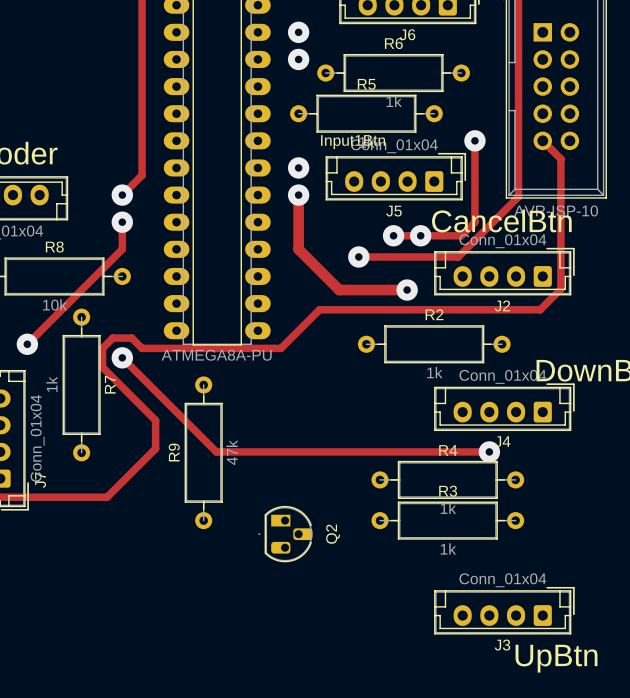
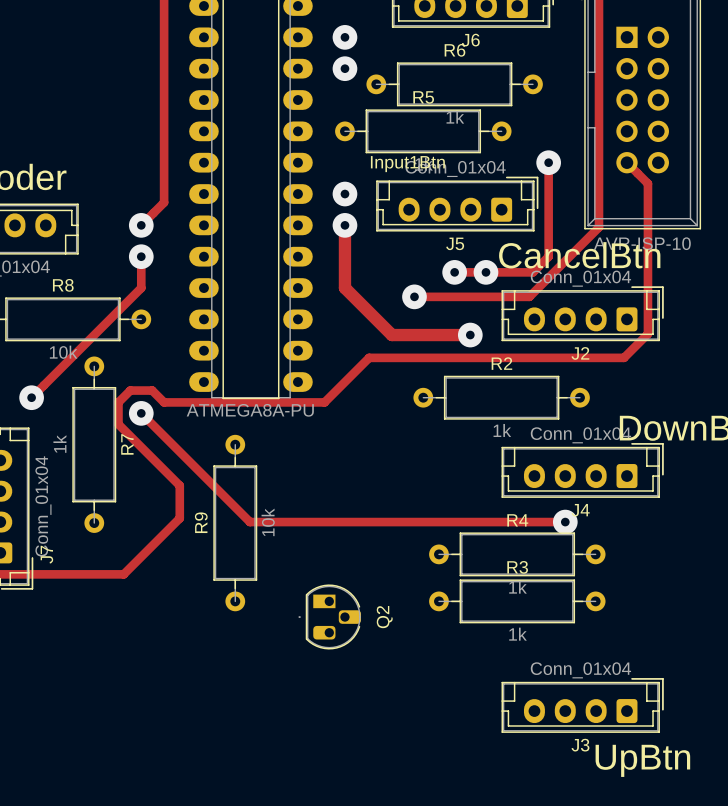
R9 value: 47k (232, 452) -> 10k (268, 522)

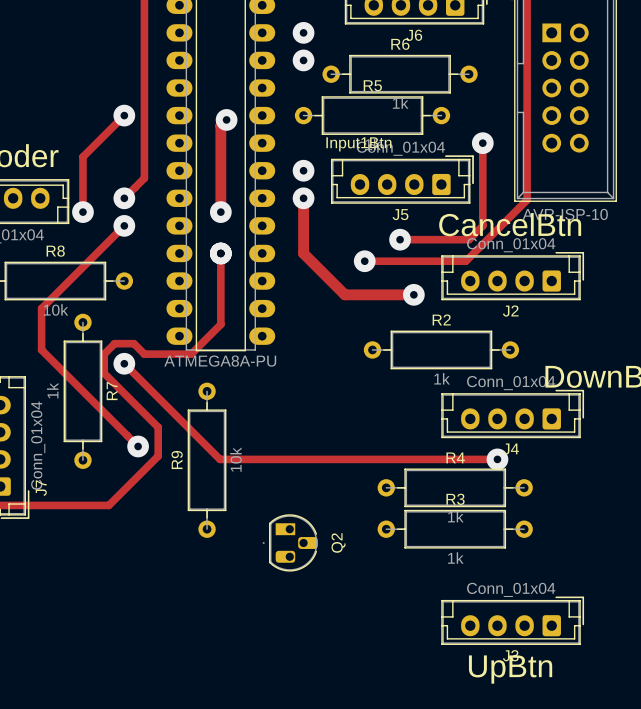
track: none -> (124, 115) (82, 156) (82, 212)
via: none -> (124, 115)
track: none -> (226, 119) (220, 125) (220, 212)
via: none -> (226, 119)
track: (626, 162) (647, 183) (647, 333) (624, 357) (369, 357) (324, 402) (217, 402) -> (220, 253) (220, 324) (191, 354)
via: none -> (82, 212)
via: none -> (220, 212)
track: (141, 256) (141, 288) (31, 397) -> (124, 225) (41, 308) (41, 349) (138, 446)
via: (485, 272) -> none
via: none -> (220, 253)
via: (31, 397) -> none
via: none -> (138, 446)
text position: UpBtn (642, 760) -> UpBtn (510, 669)

